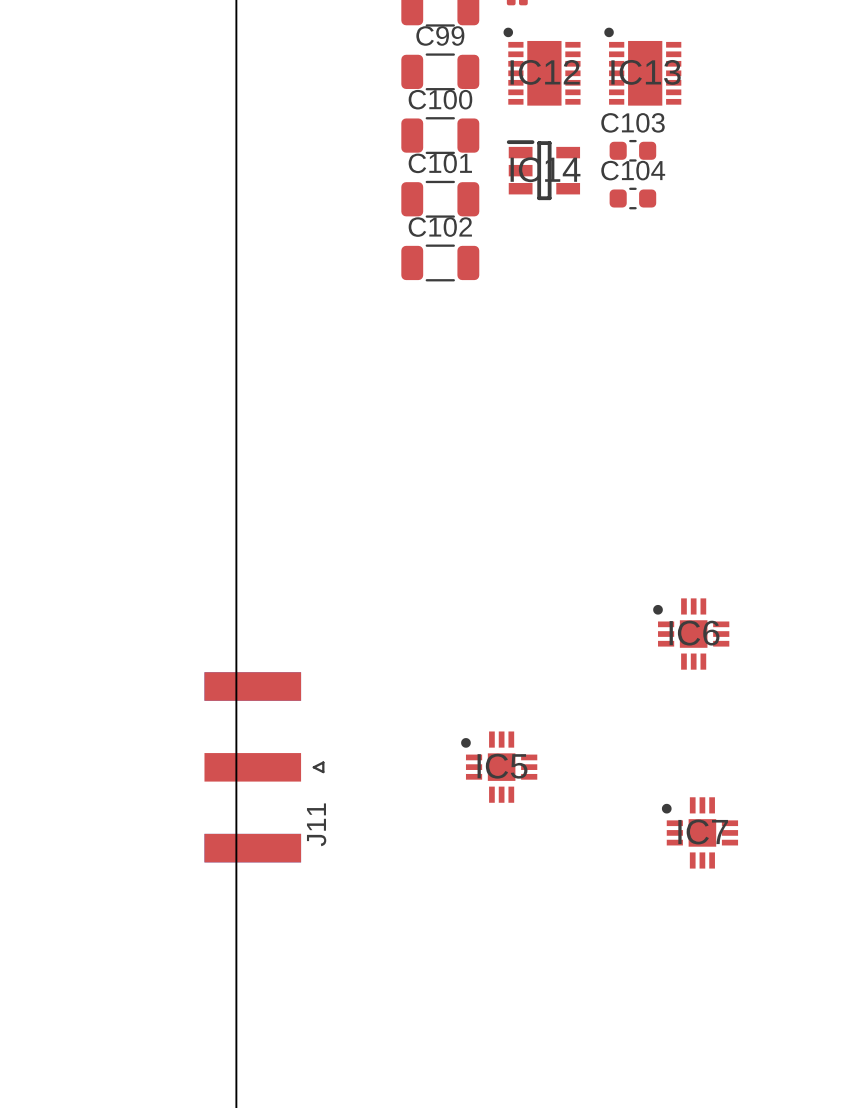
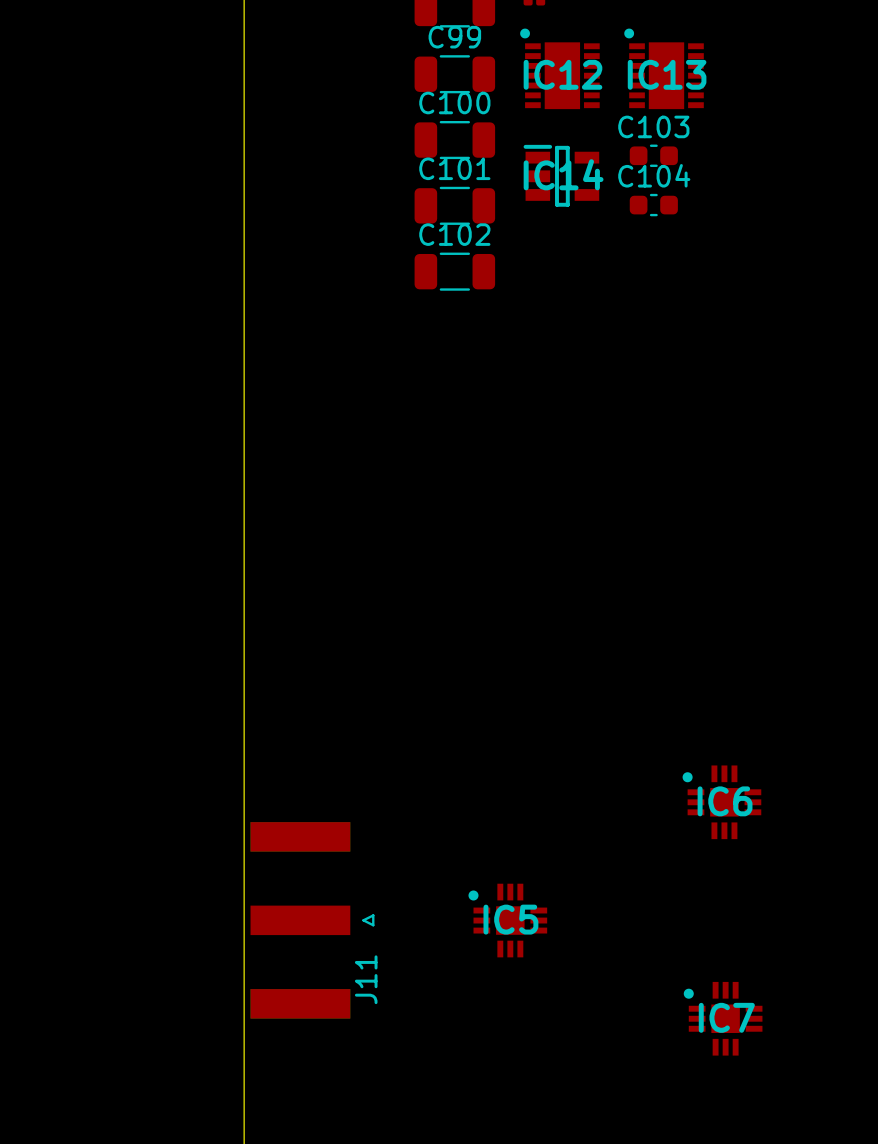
IC6 position: (691, 634) -> (721, 802)
J11 position: (264, 767) -> (312, 920)
IC5 position: (499, 767) -> (507, 920)
IC7 position: (699, 832) -> (723, 1018)

